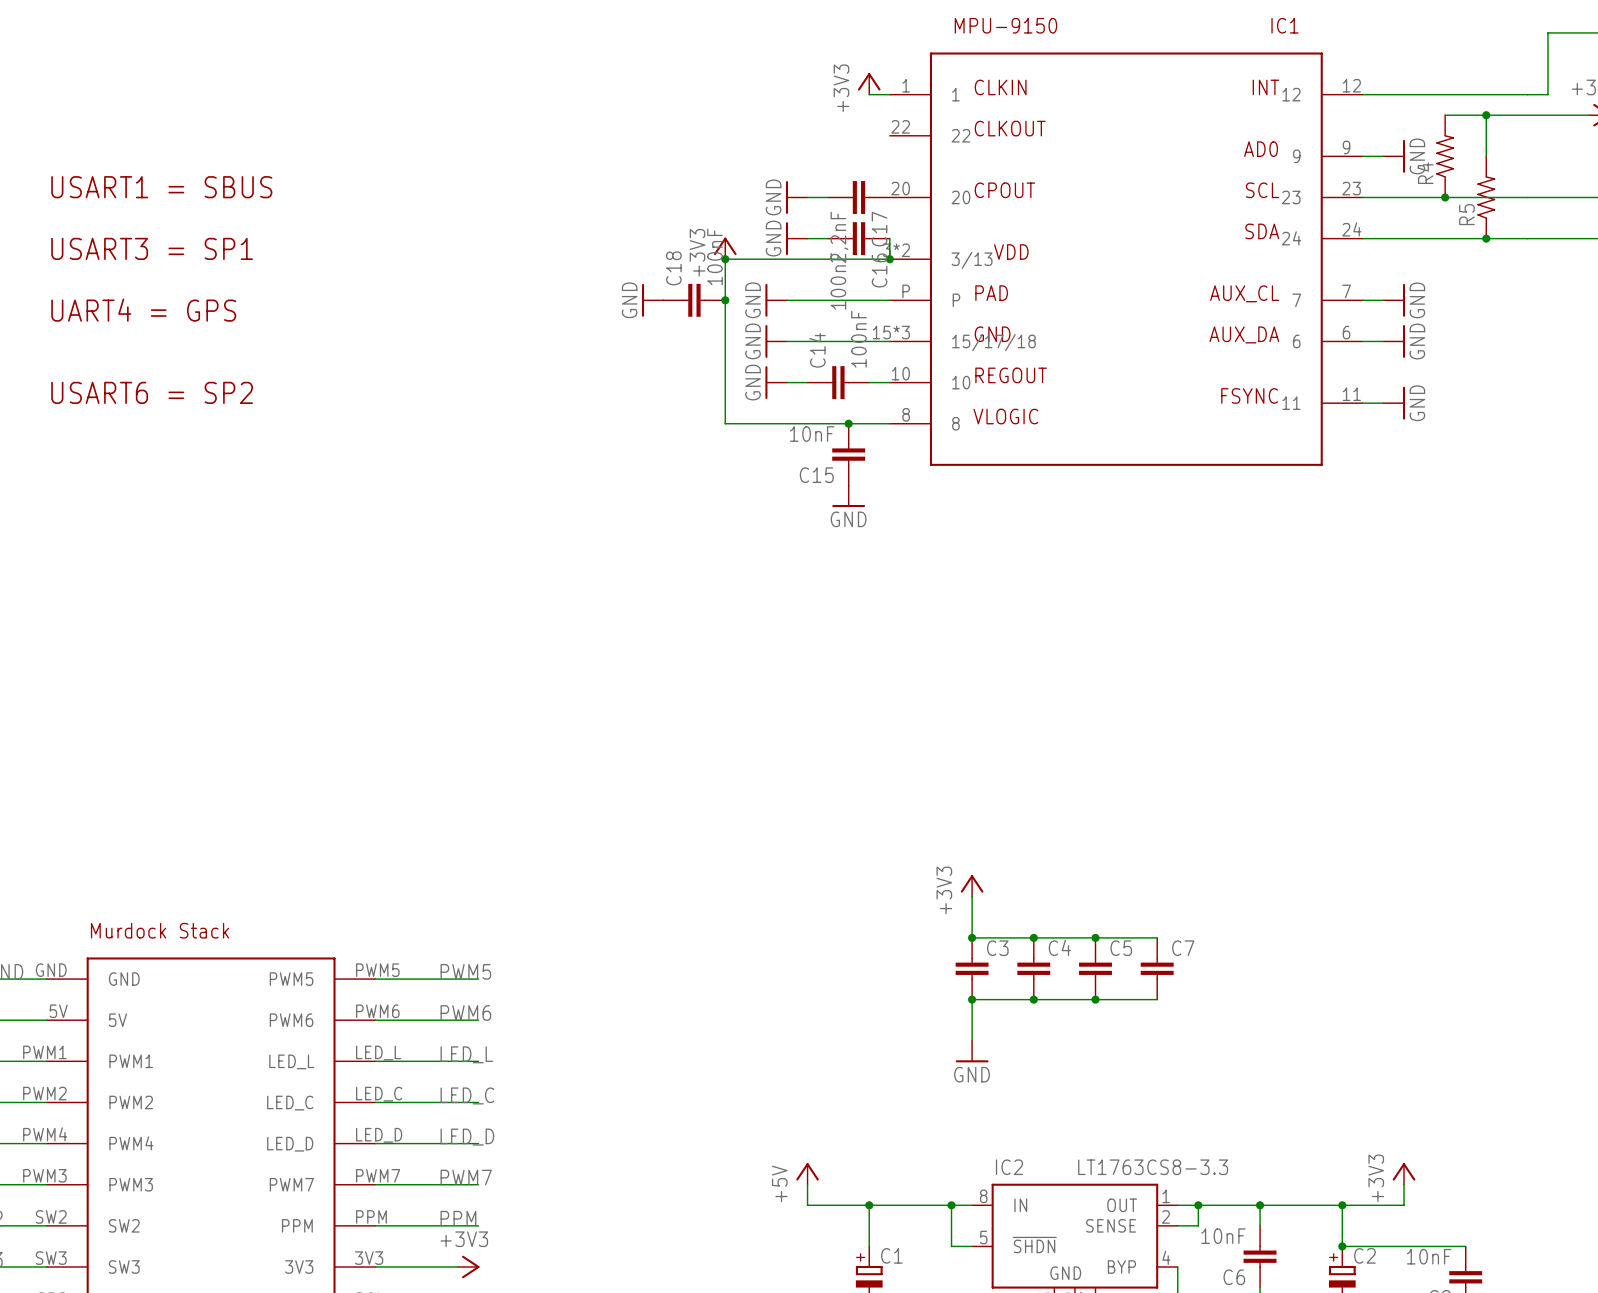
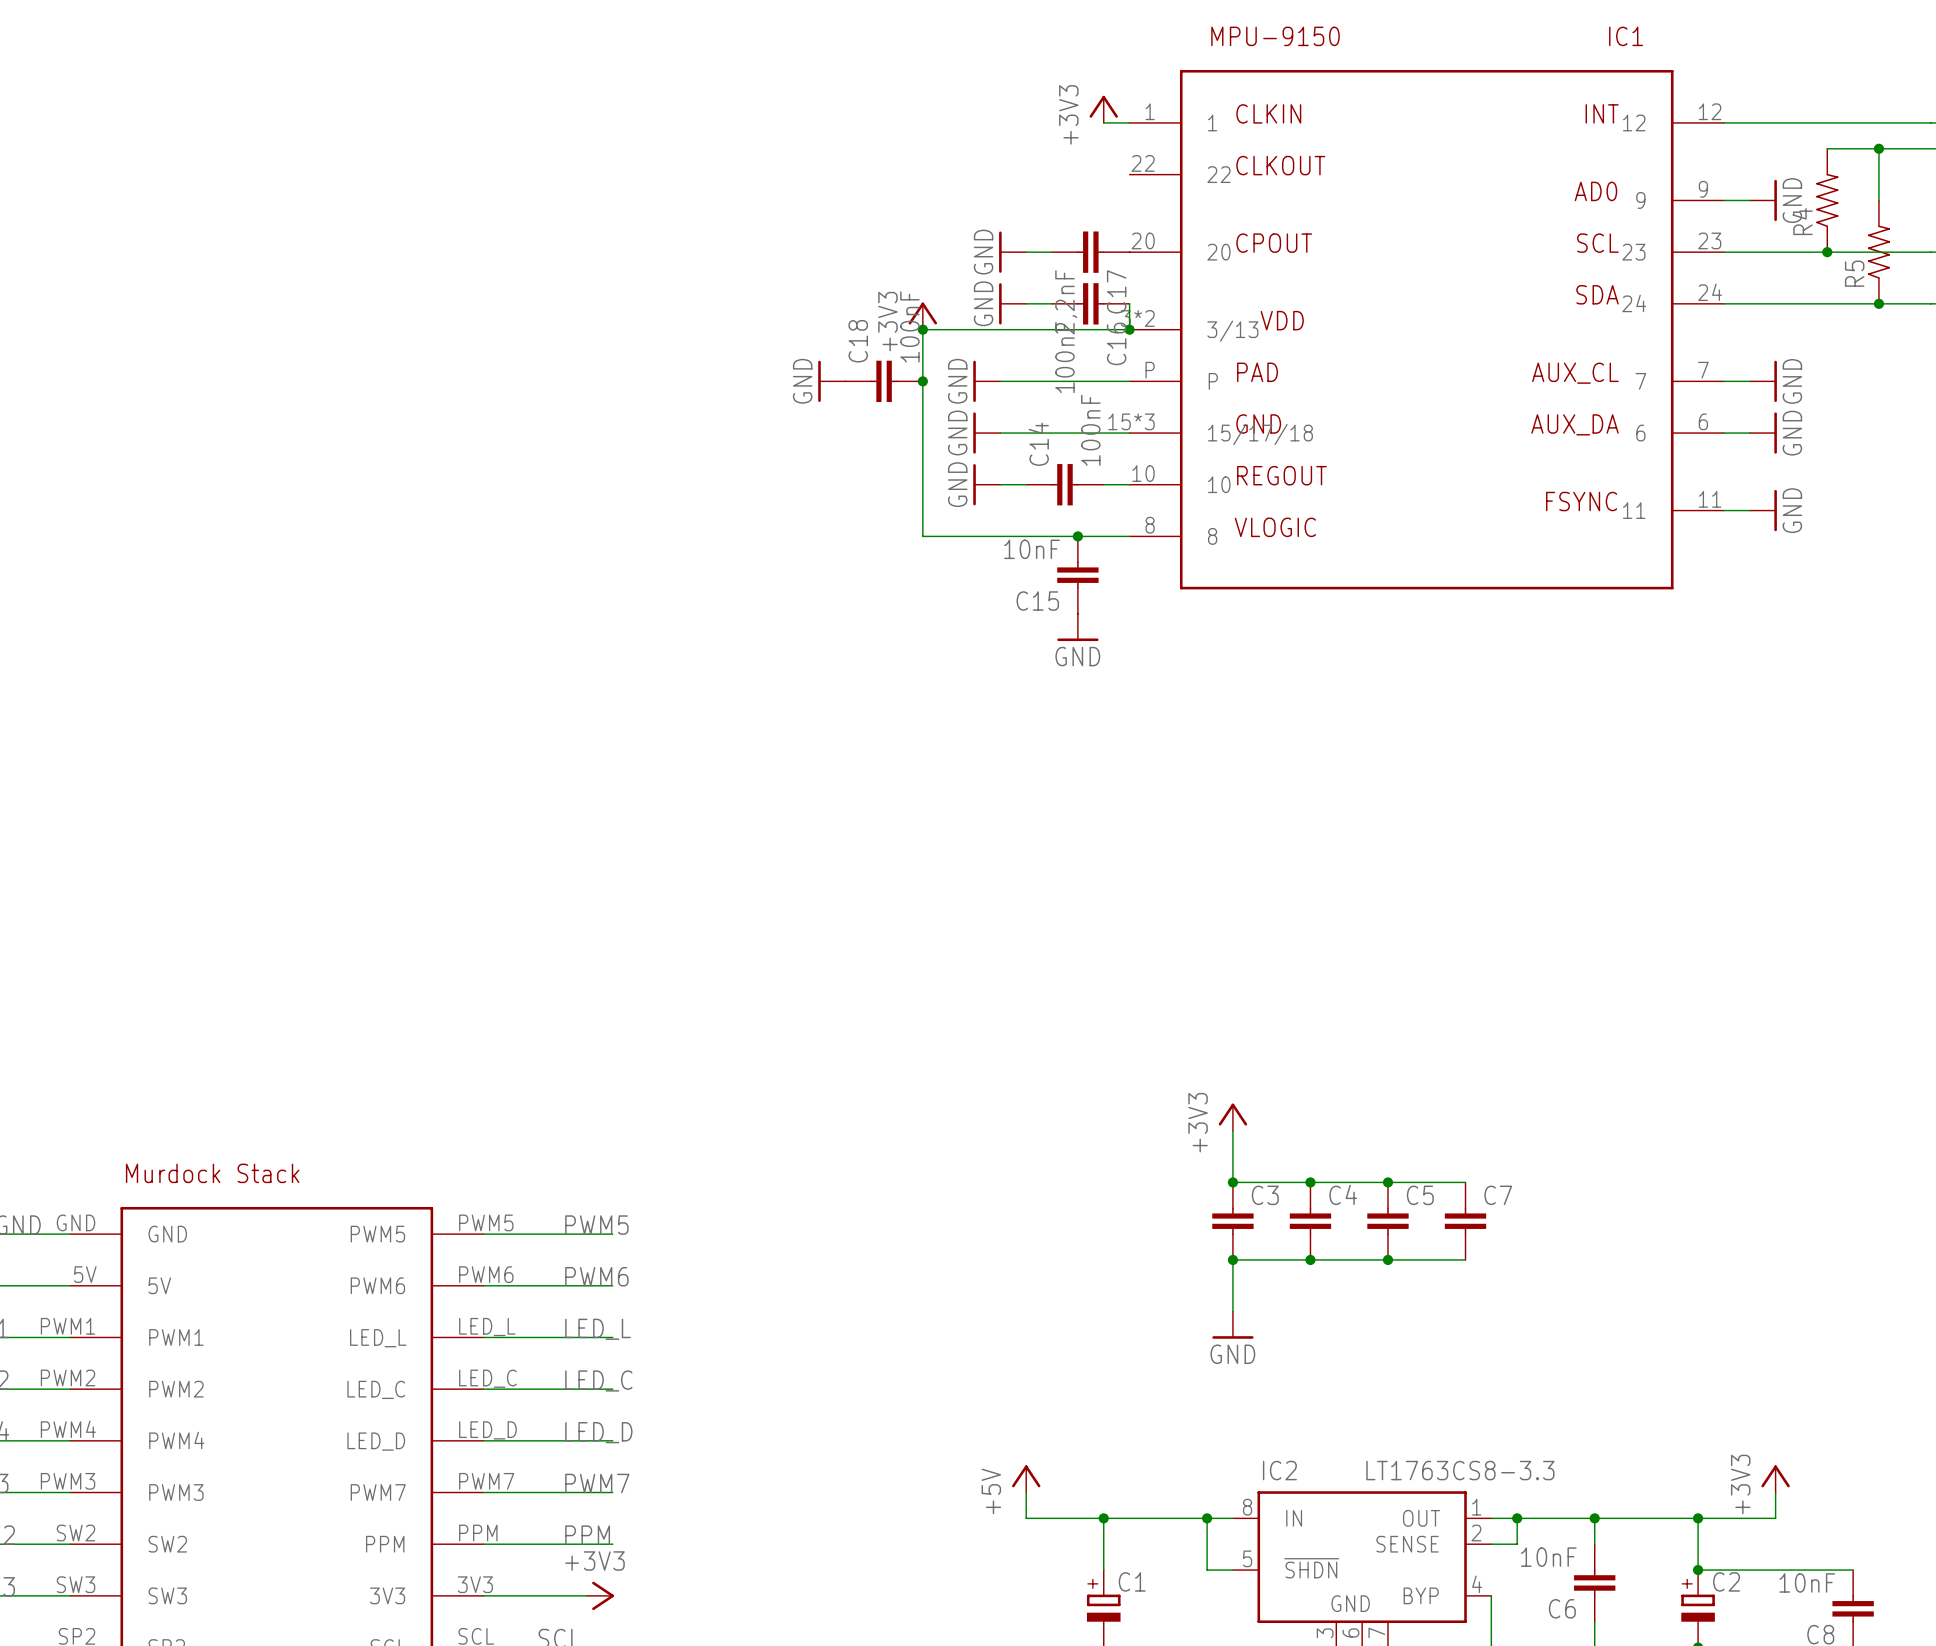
text: USART1 = SBUS (161, 187) -> none
text: USART3 = SP1 (152, 248) -> none
text: UART4 = GPS (143, 310) -> none
text: USART6 = SP2 (152, 392) -> none

